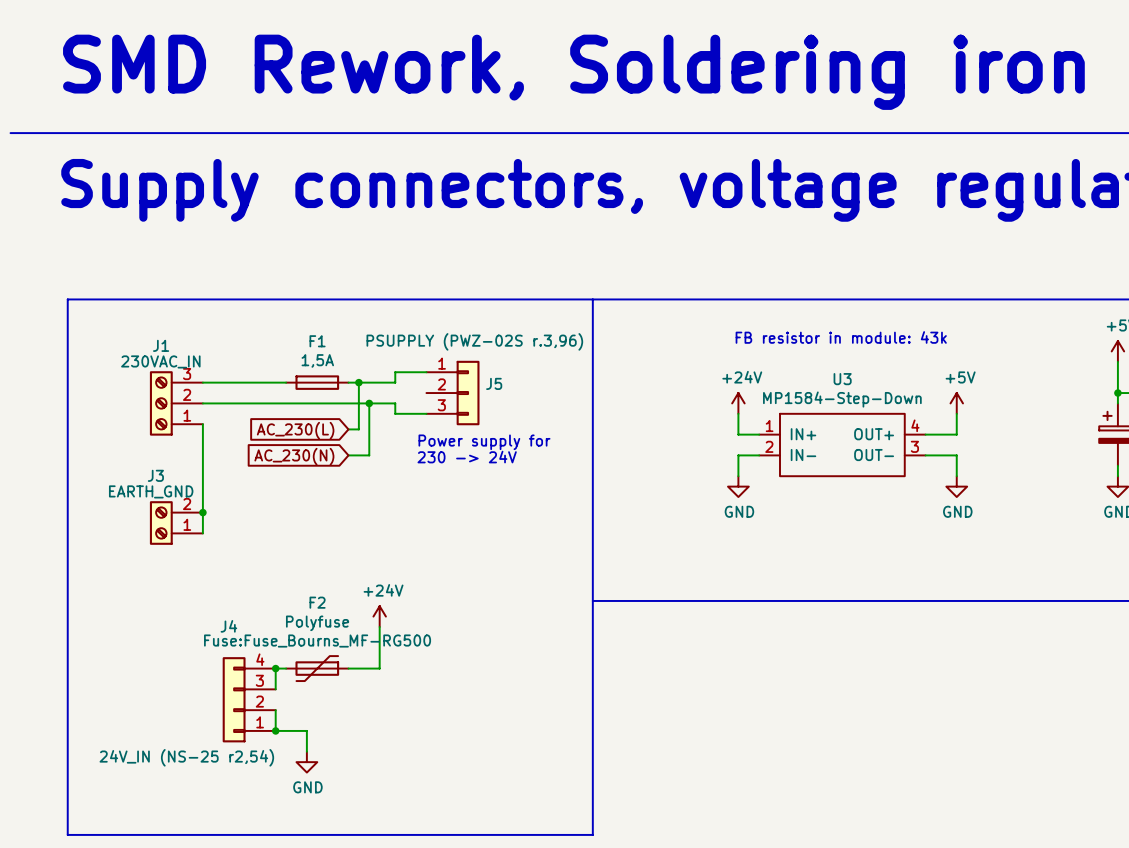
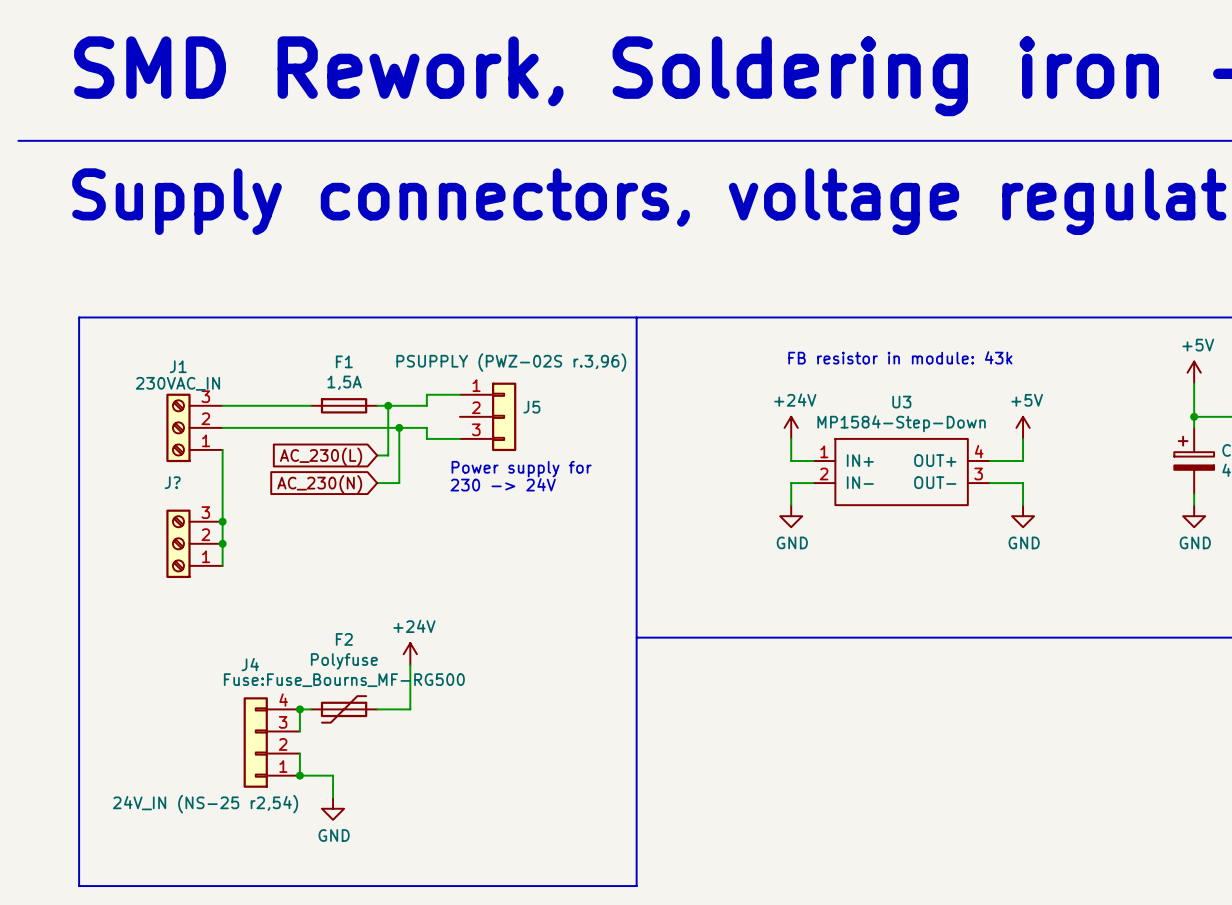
junction: none -> (222, 521)
J?: none -> (194, 543)
J3: EARTH_GND (176, 523) -> none

